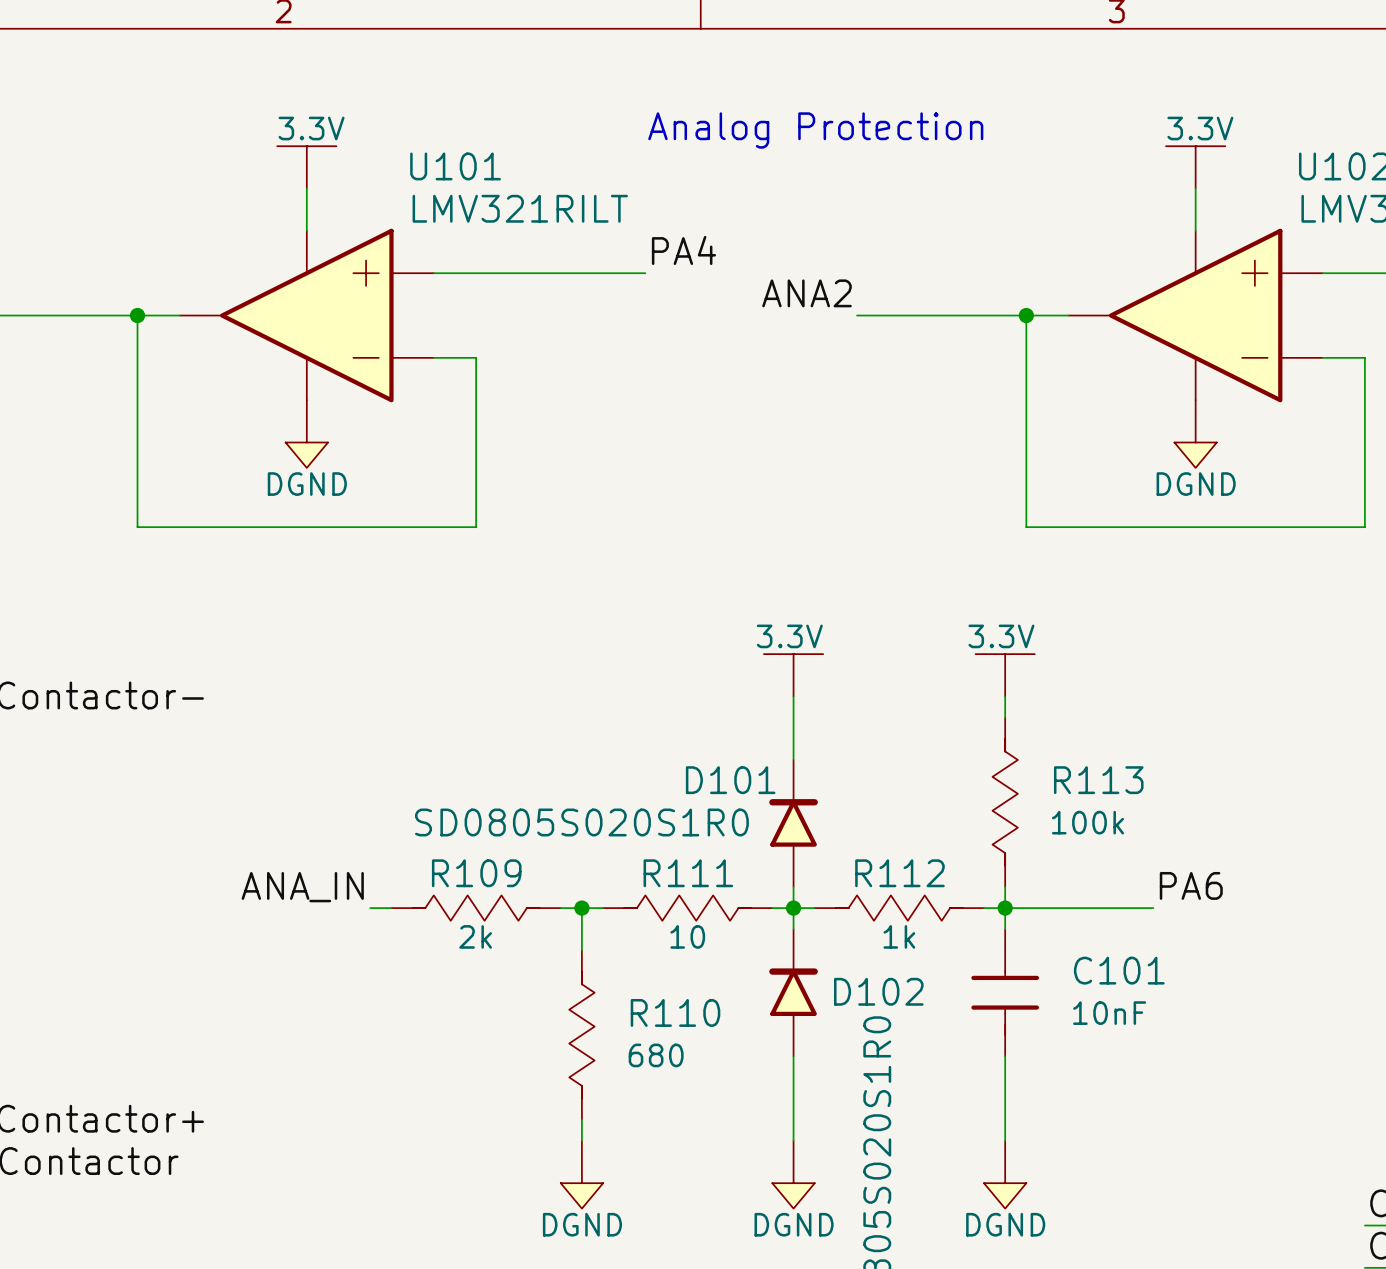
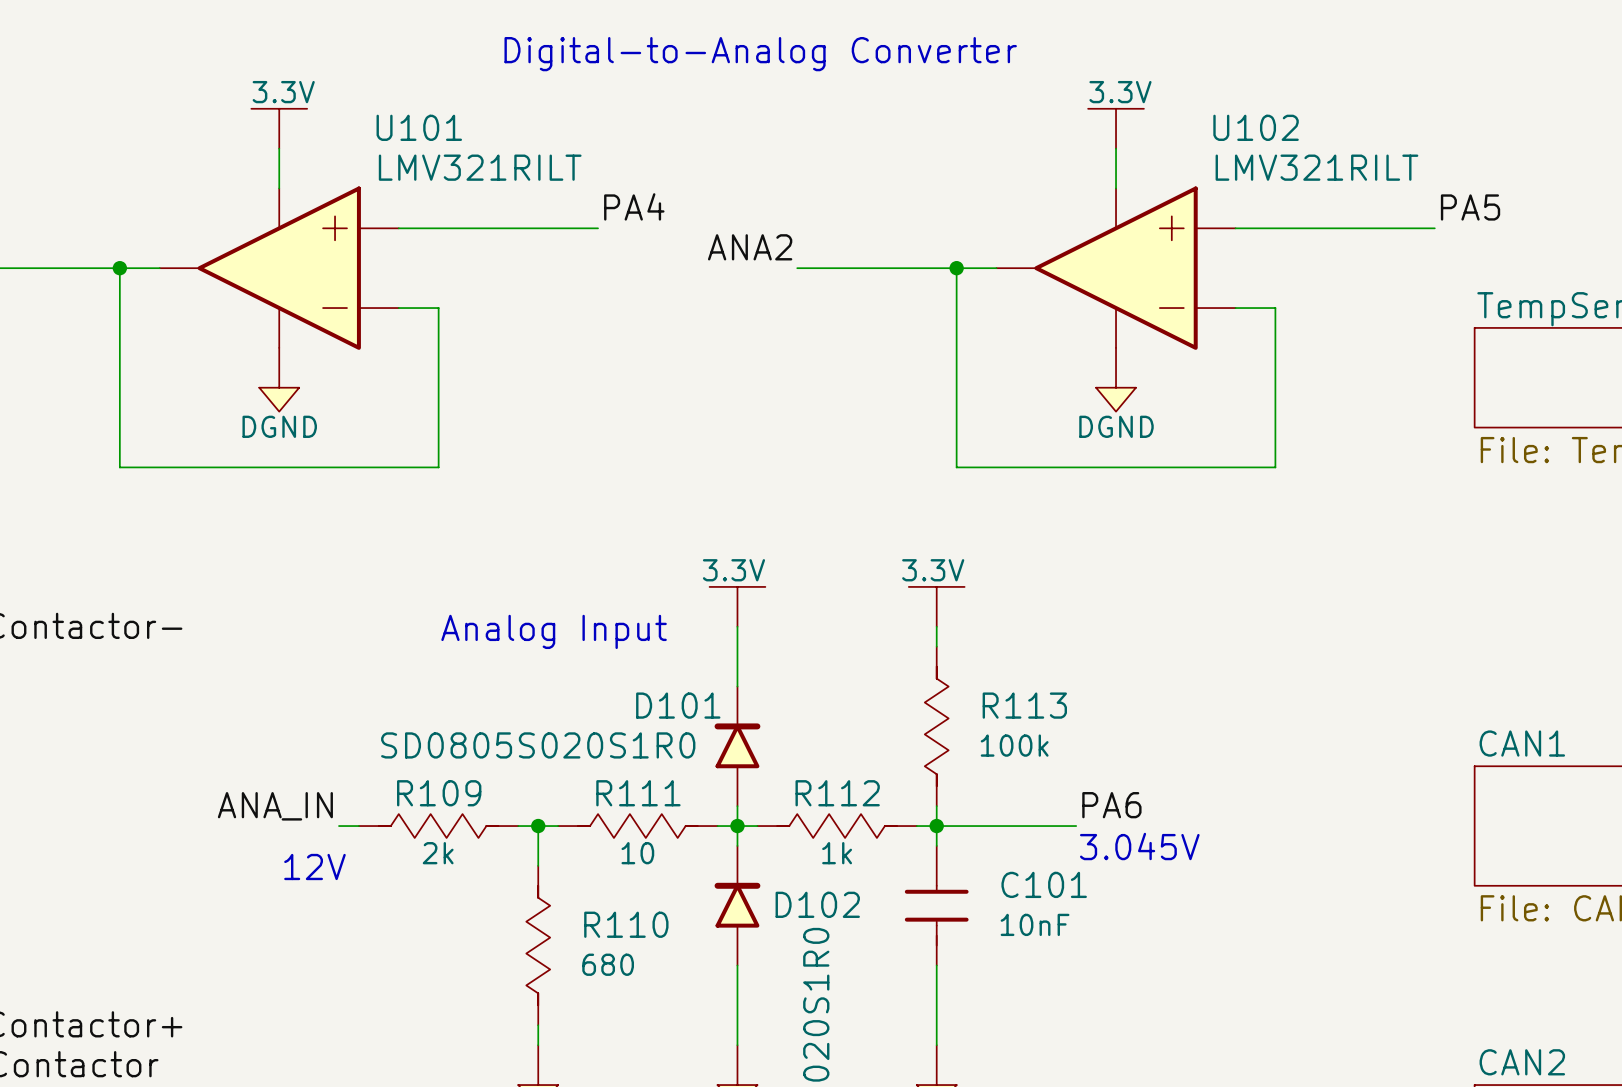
text: none -> Digital-to-Analog Converter (760, 54)
text: Analog Protection (815, 130) -> none
text: none -> Analog Input (554, 631)
text: none -> 3.045V (1139, 846)
text: none -> 12V (314, 866)

